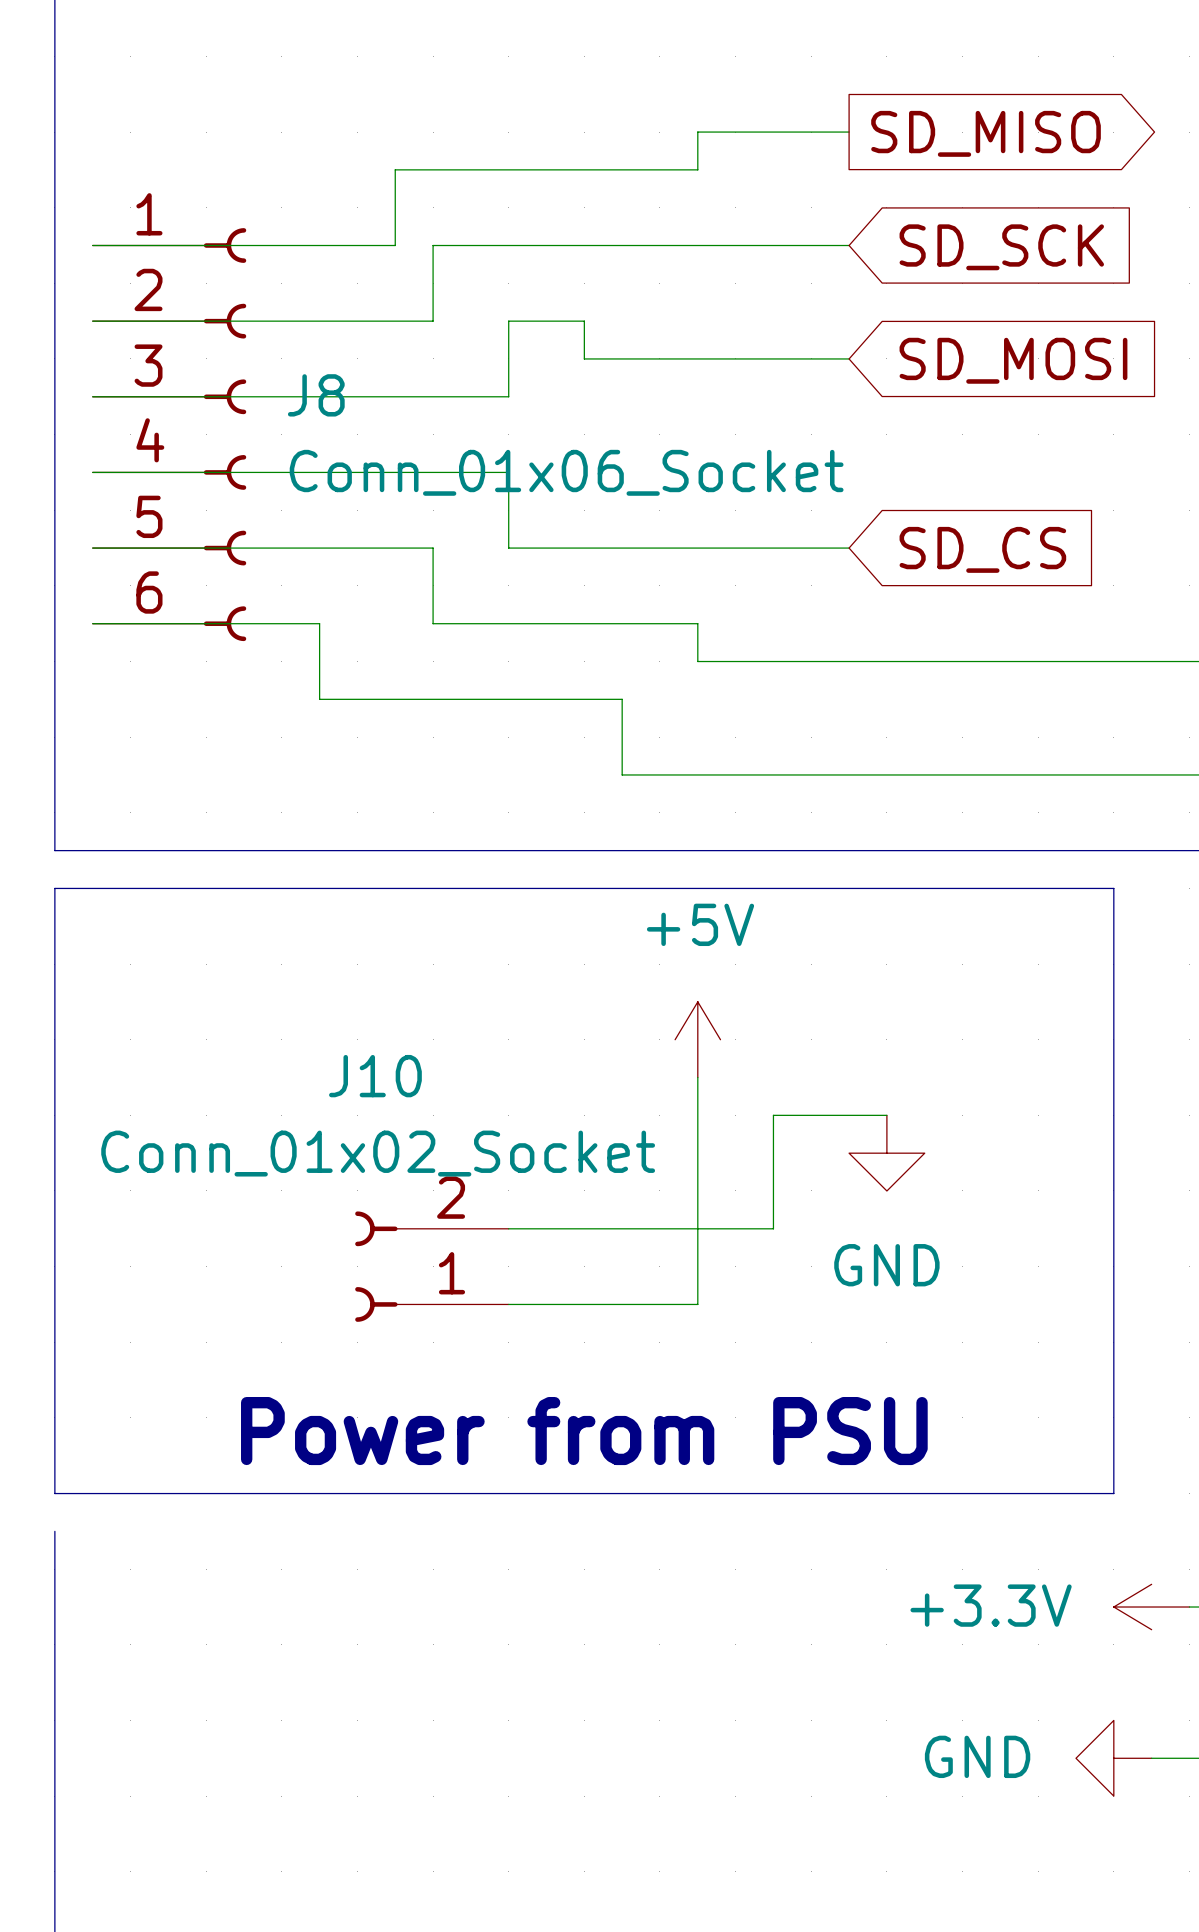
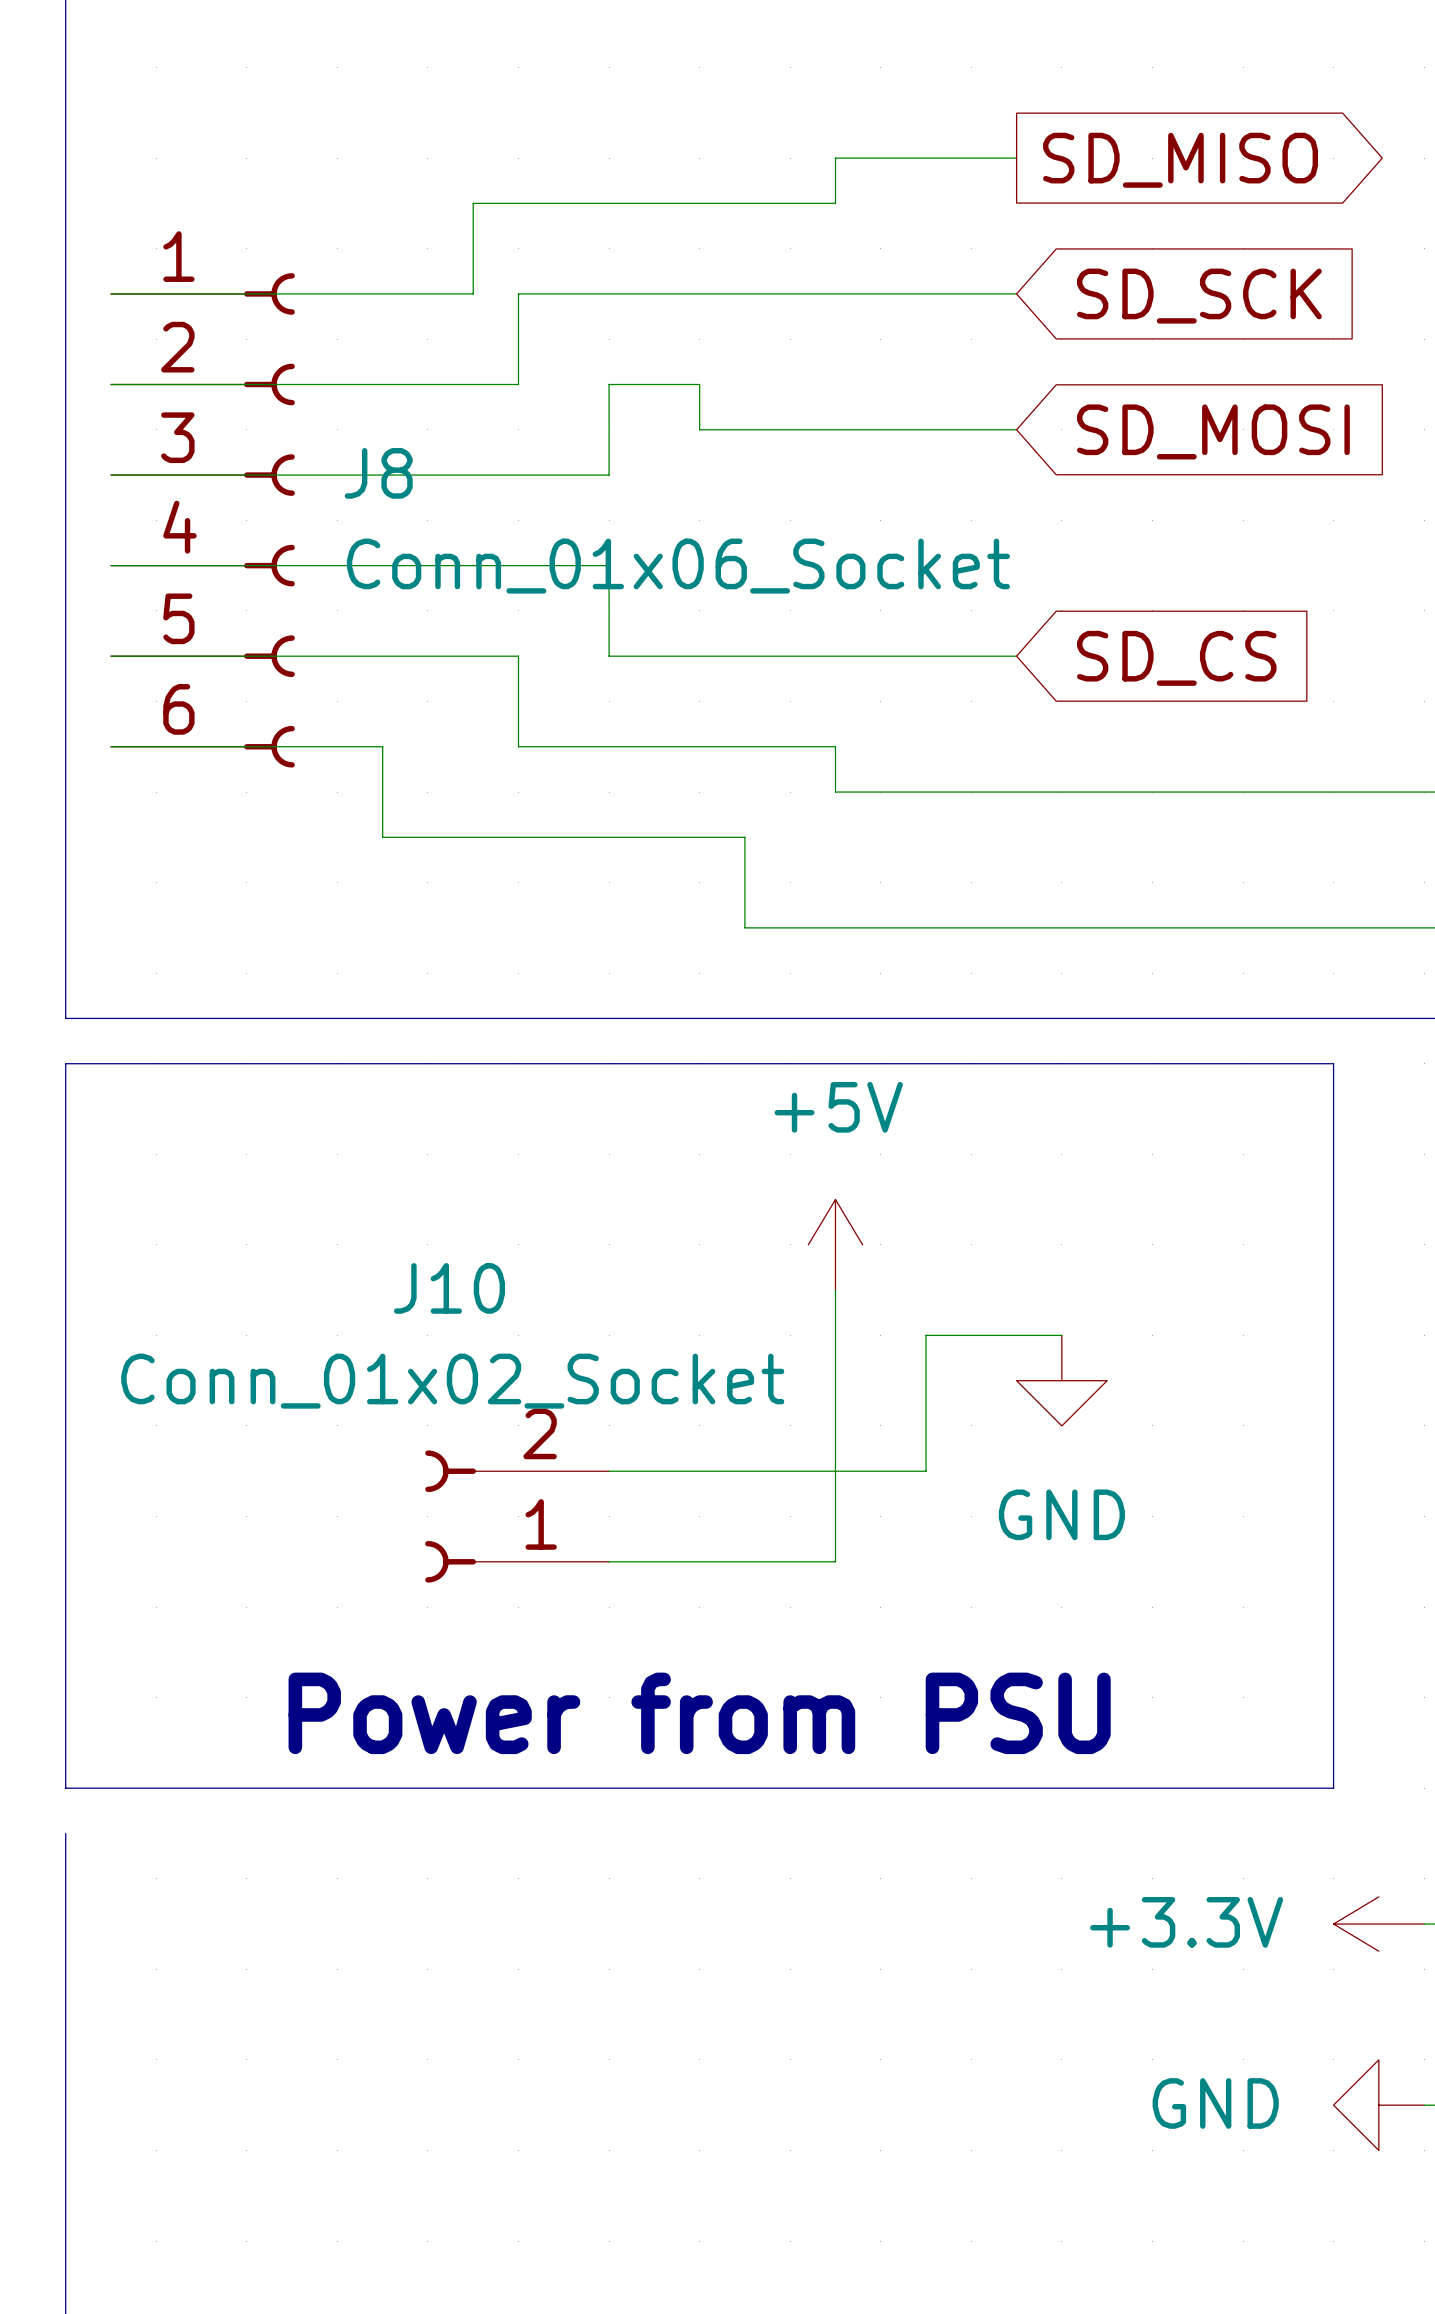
power symbol position: GND (1113, 1758) -> GND (1378, 2105)

